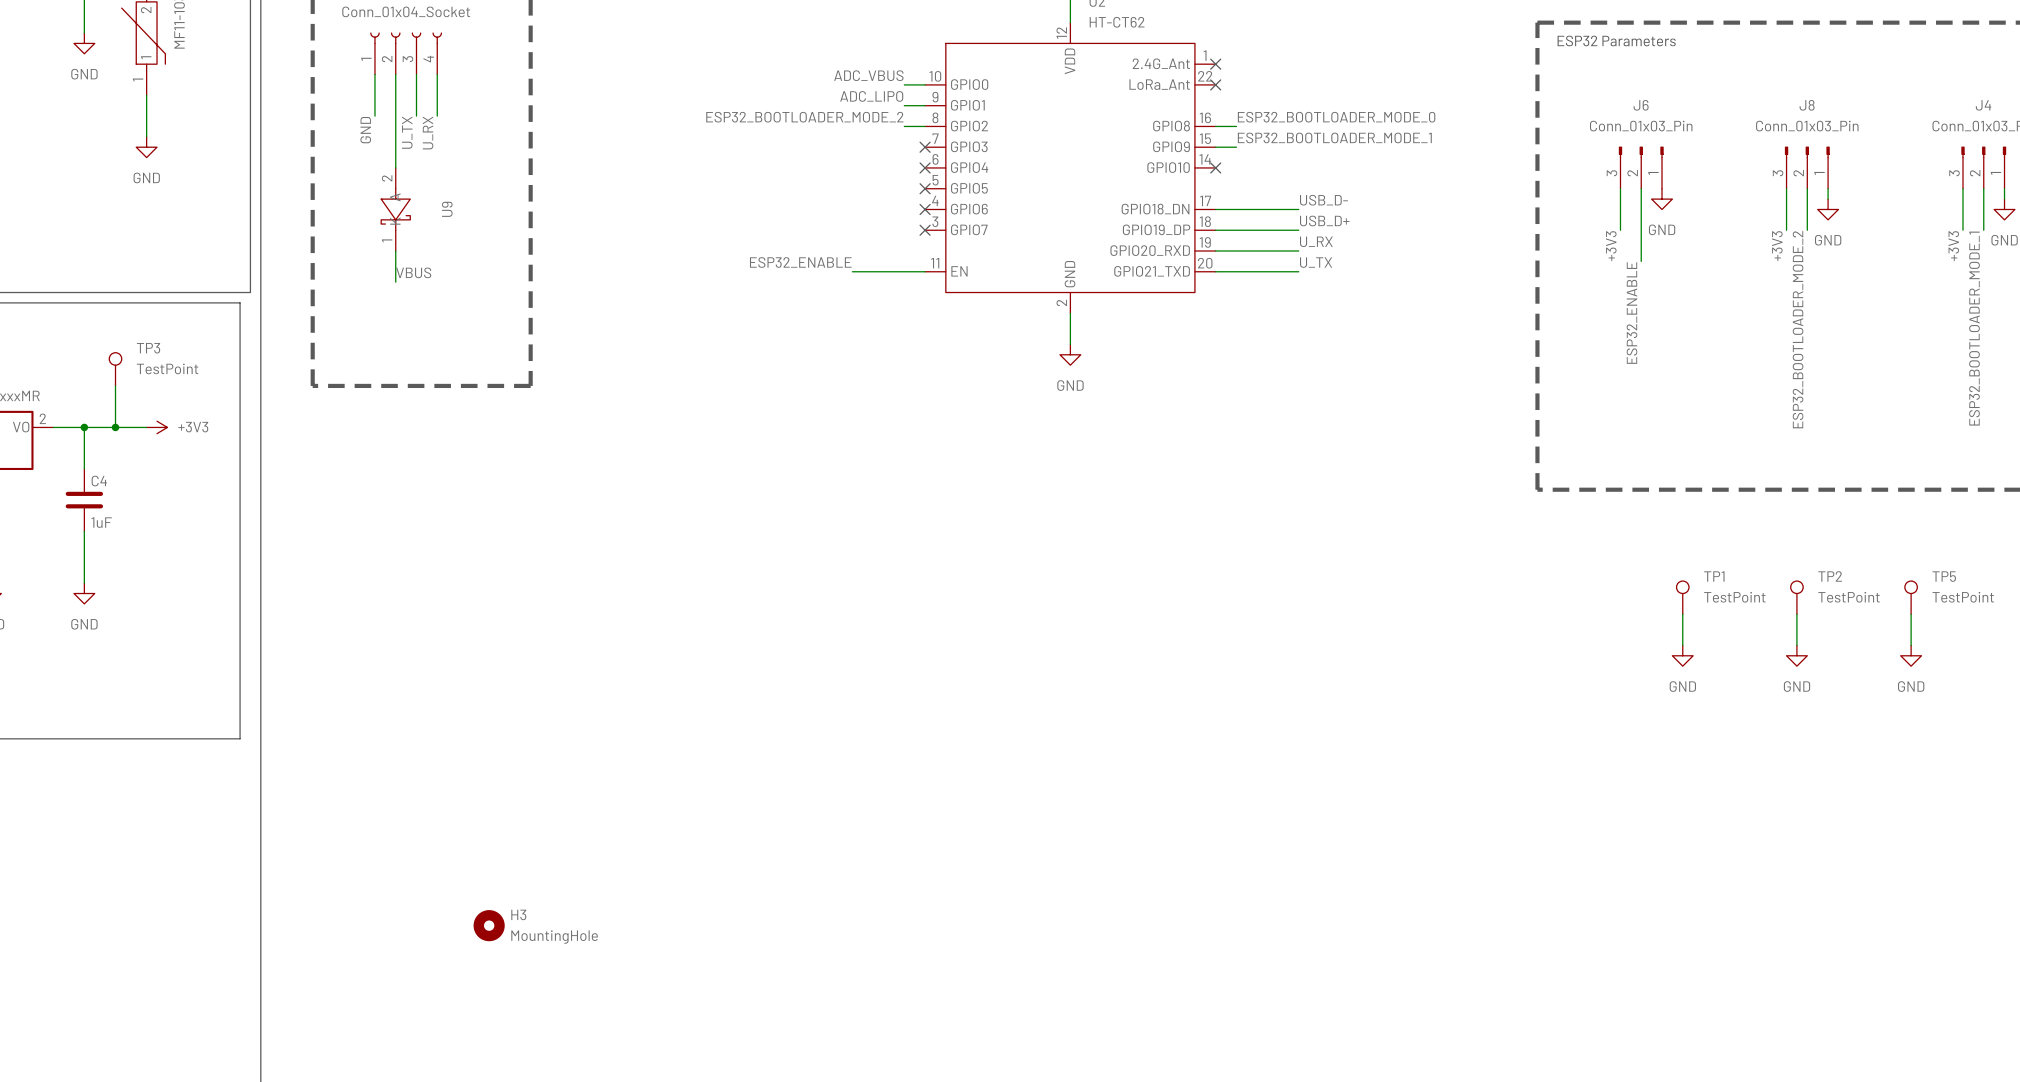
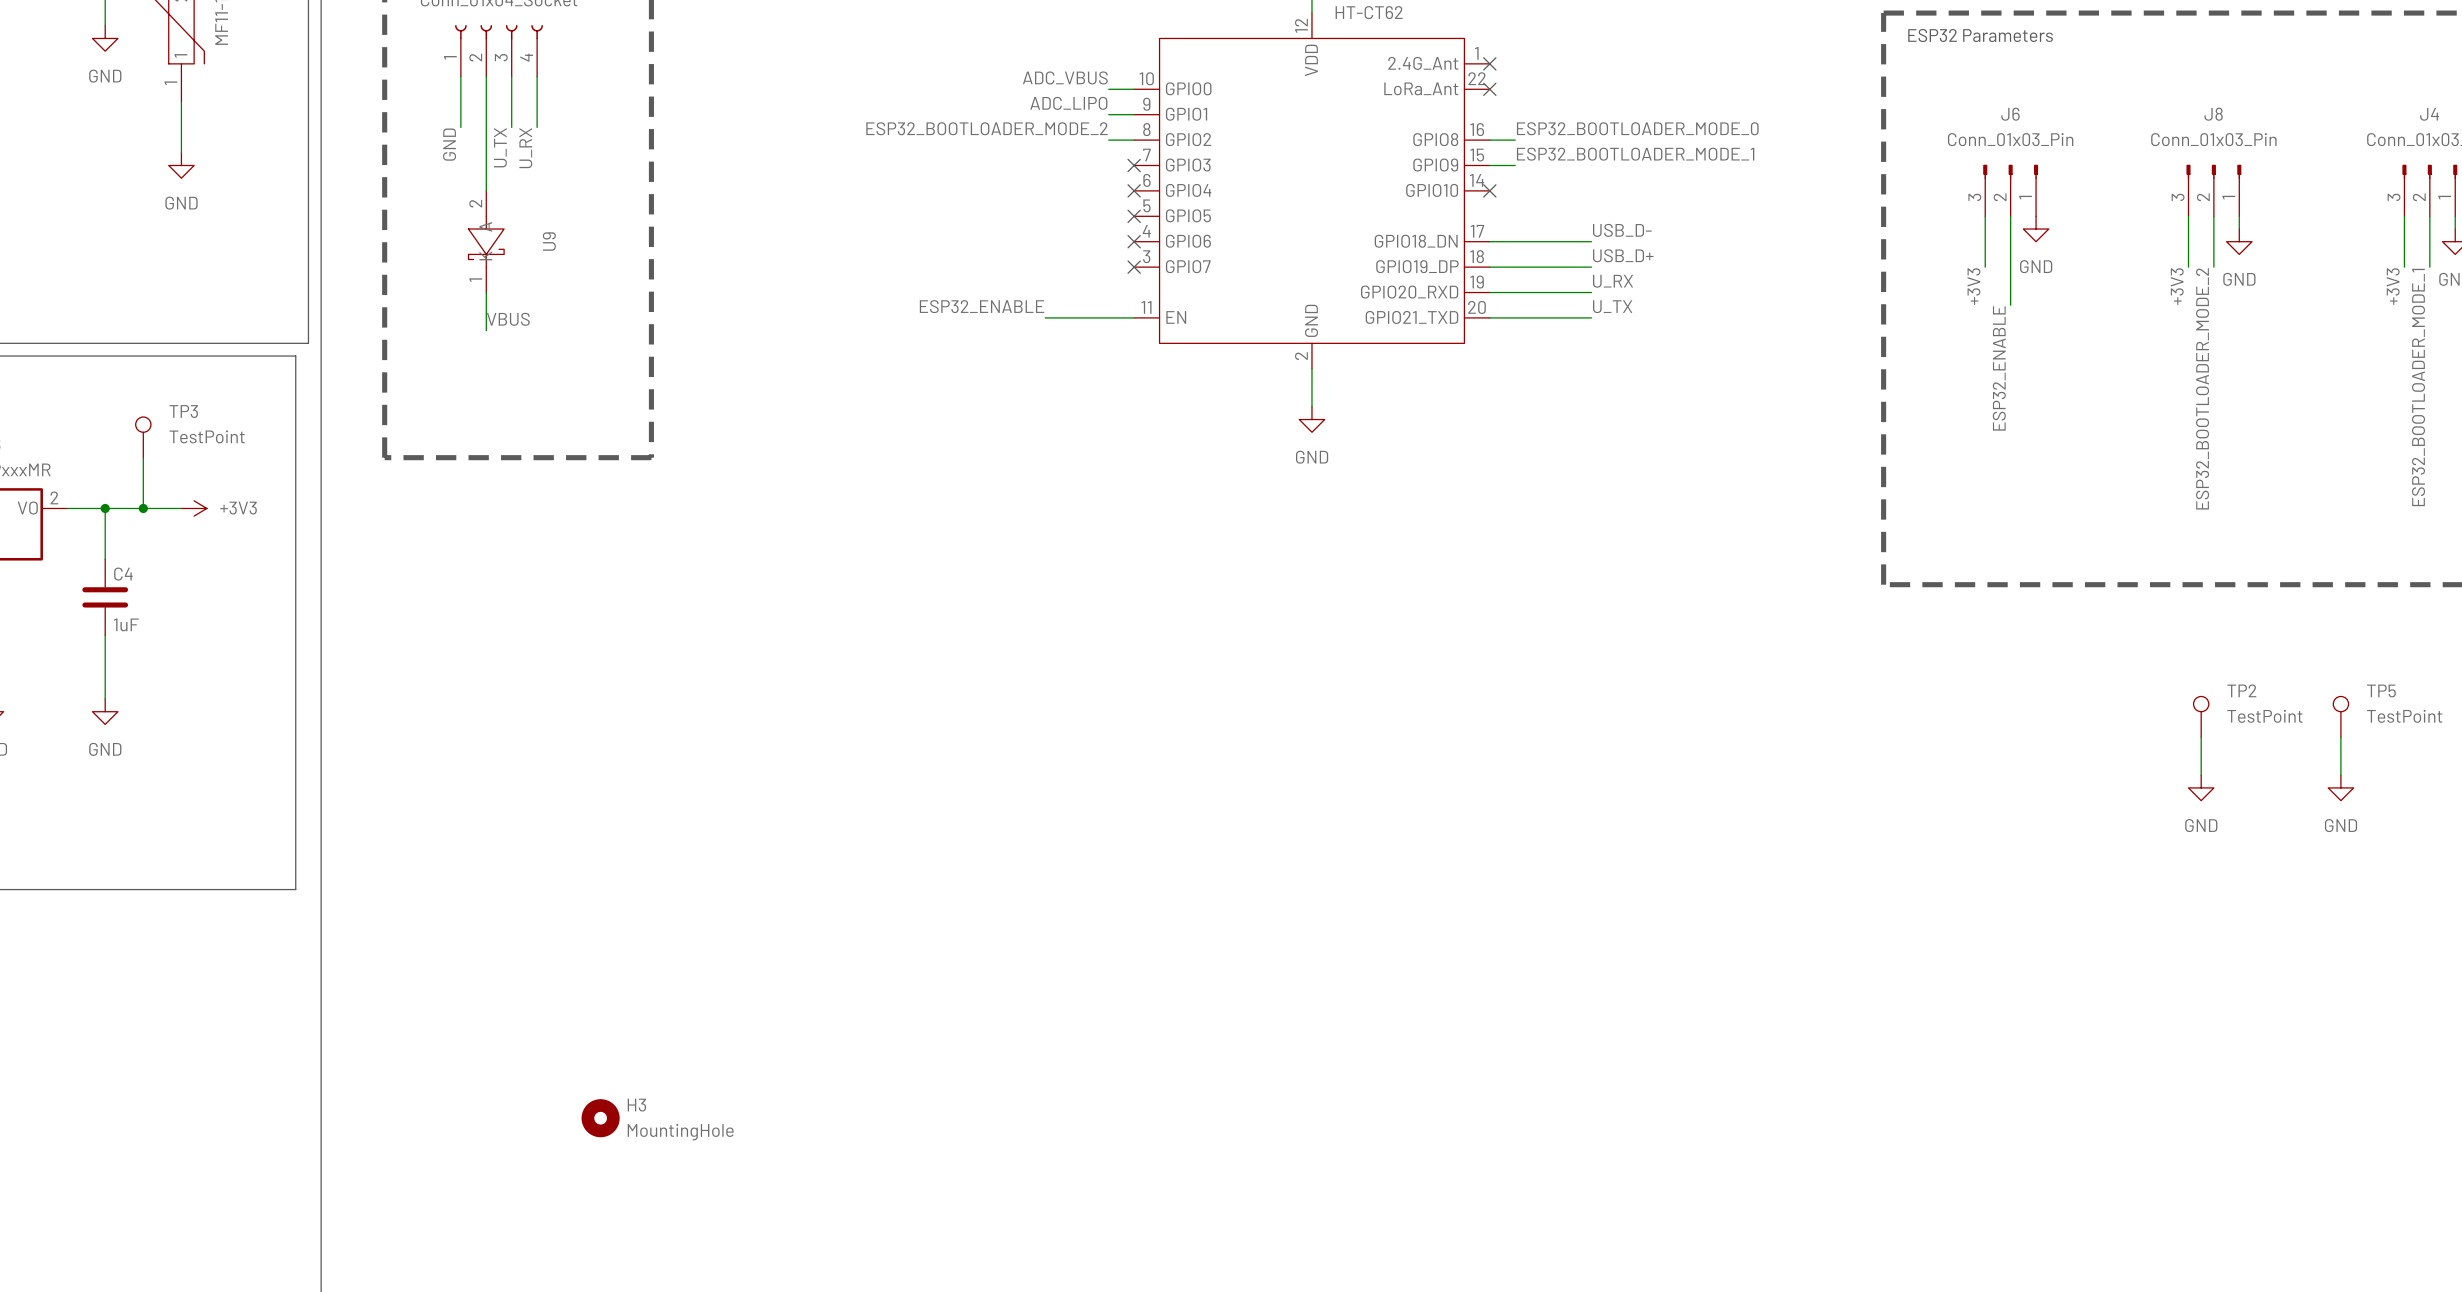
TP1: TestPoint (1682, 597) -> none
wire: (1682, 614) (1682, 645) -> none
power symbol: GND (1682, 655) -> none

